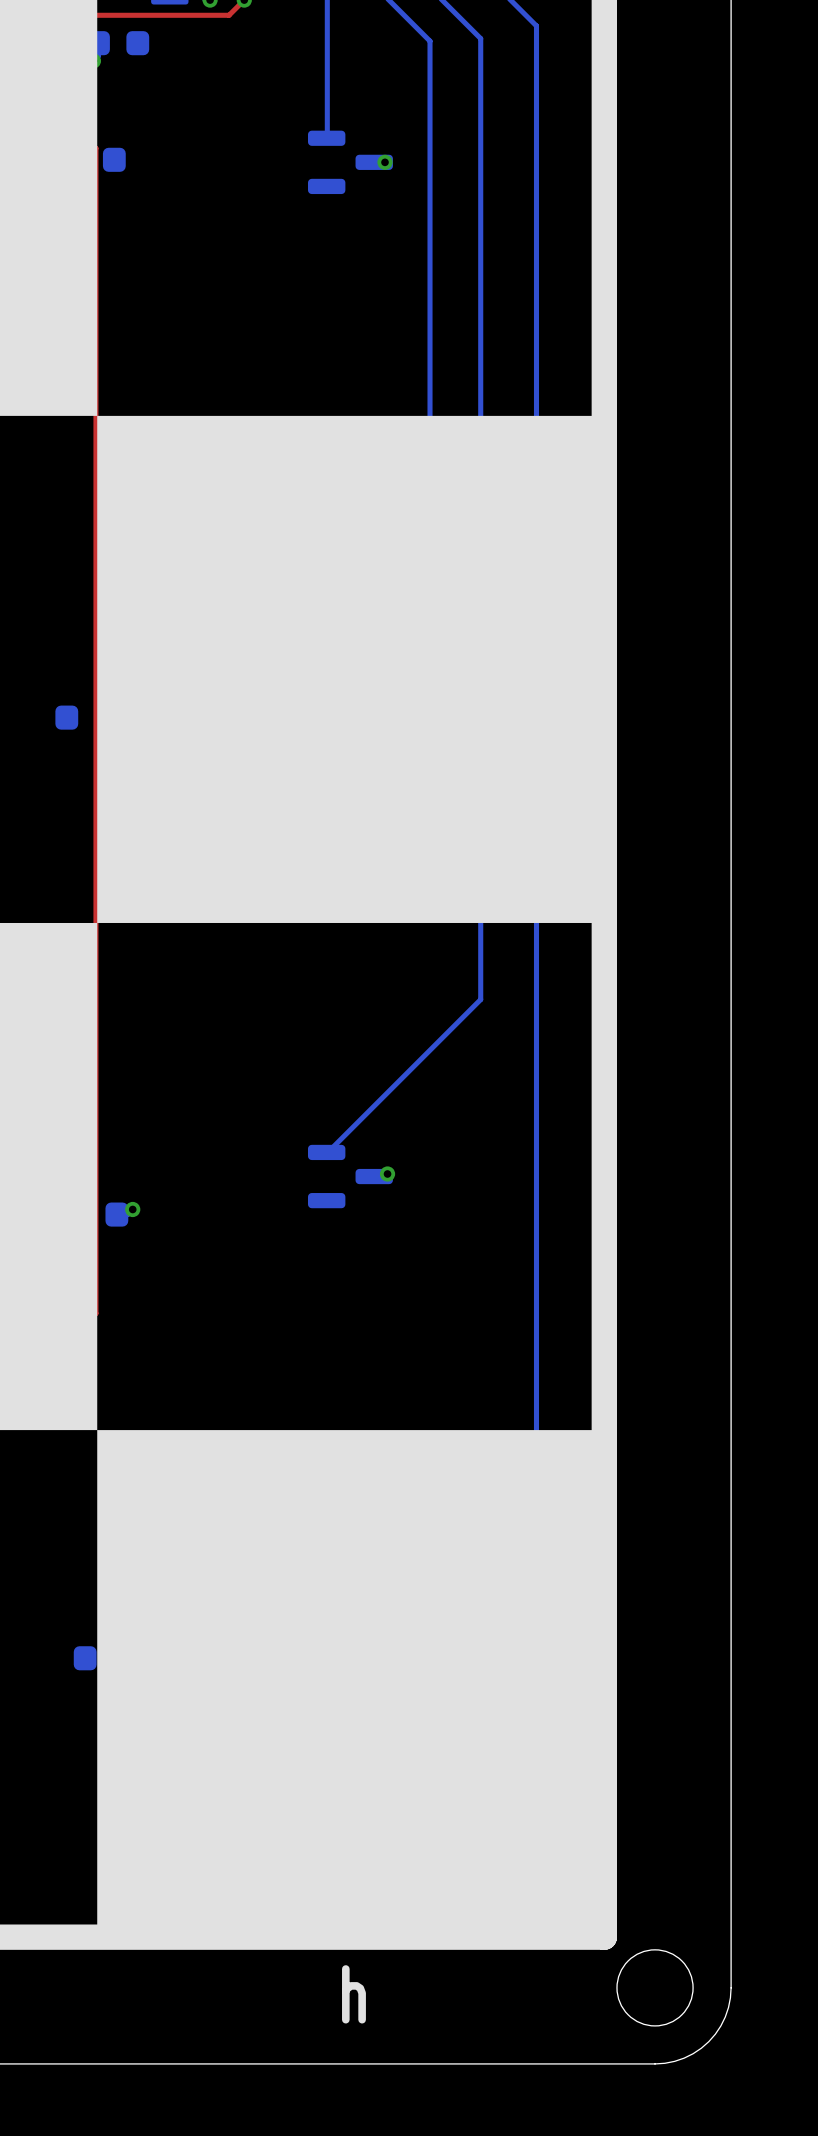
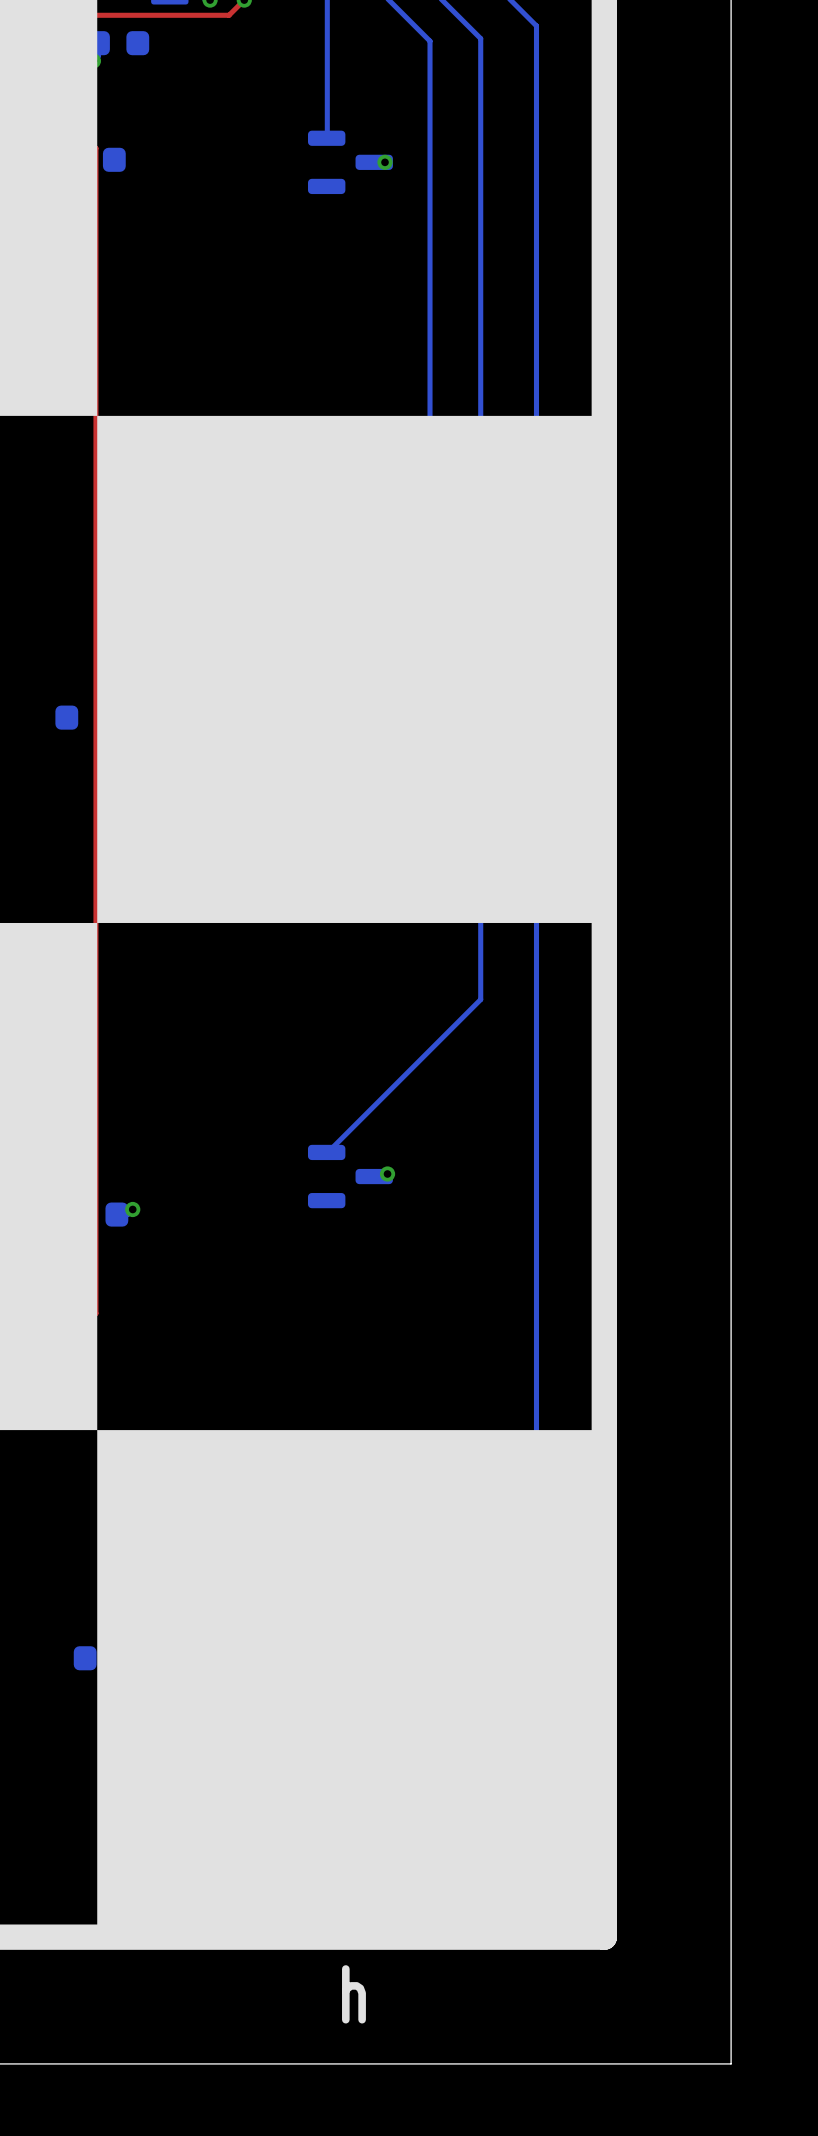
round board edge: [616, 1949, 694, 2027] -> none
board edge: (731, 1987) (725, 2016) (708, 2041) (684, 2058) (655, 2063) -> (731, 1987) (731, 2063) (655, 2063)

